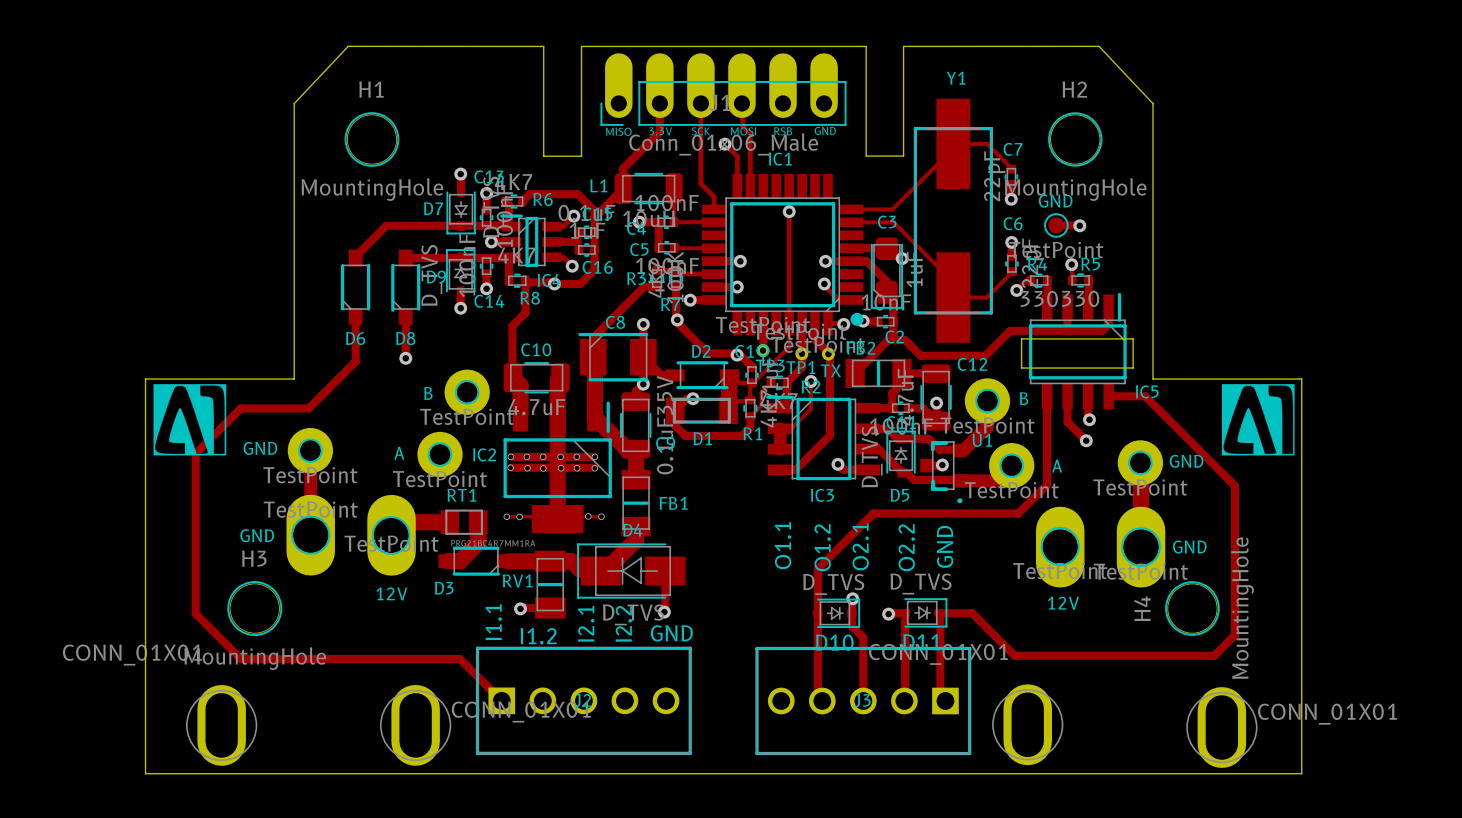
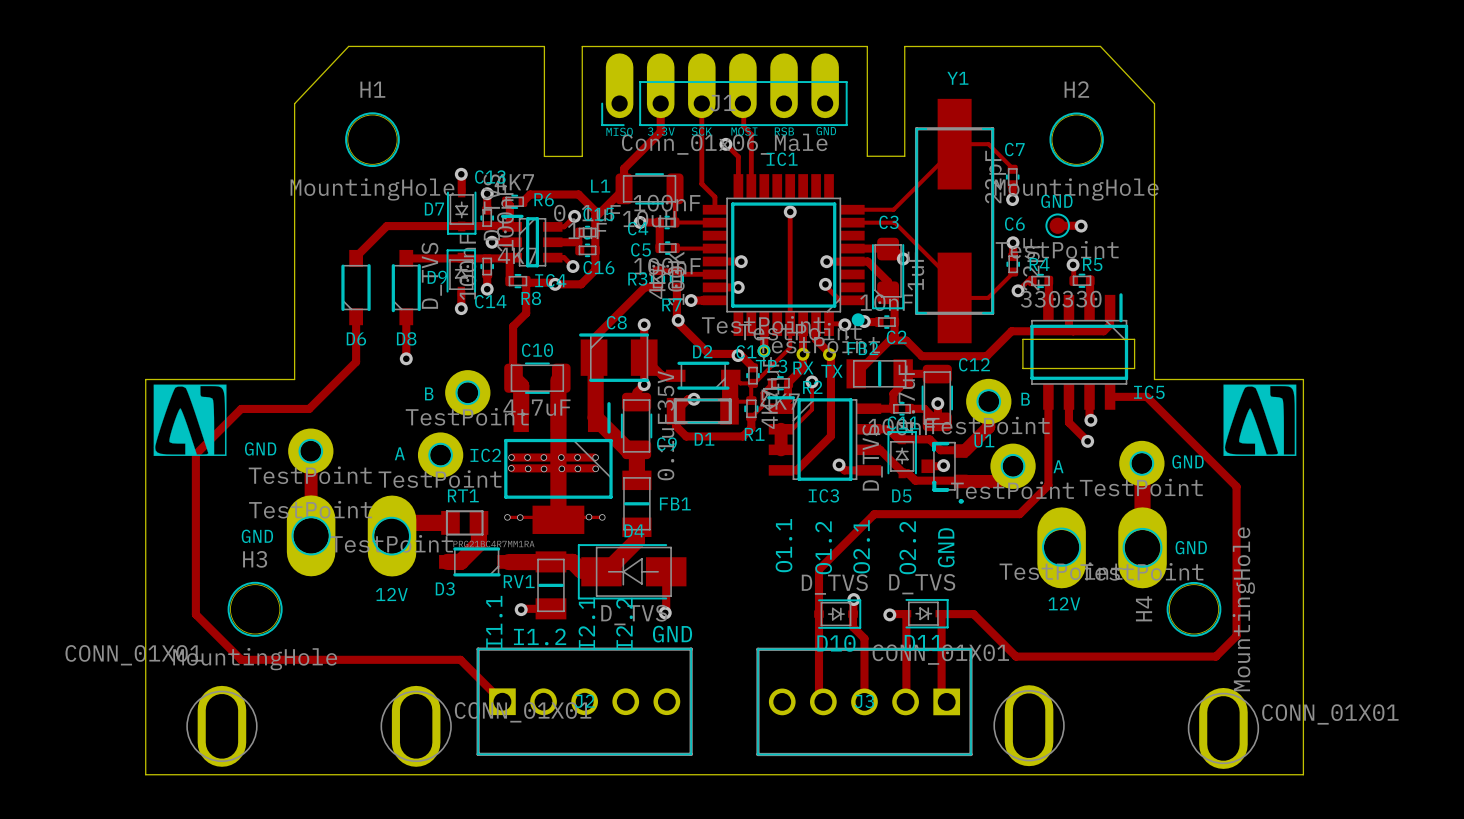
TP1 name: TP1 (801, 367) -> RX (803, 368)

